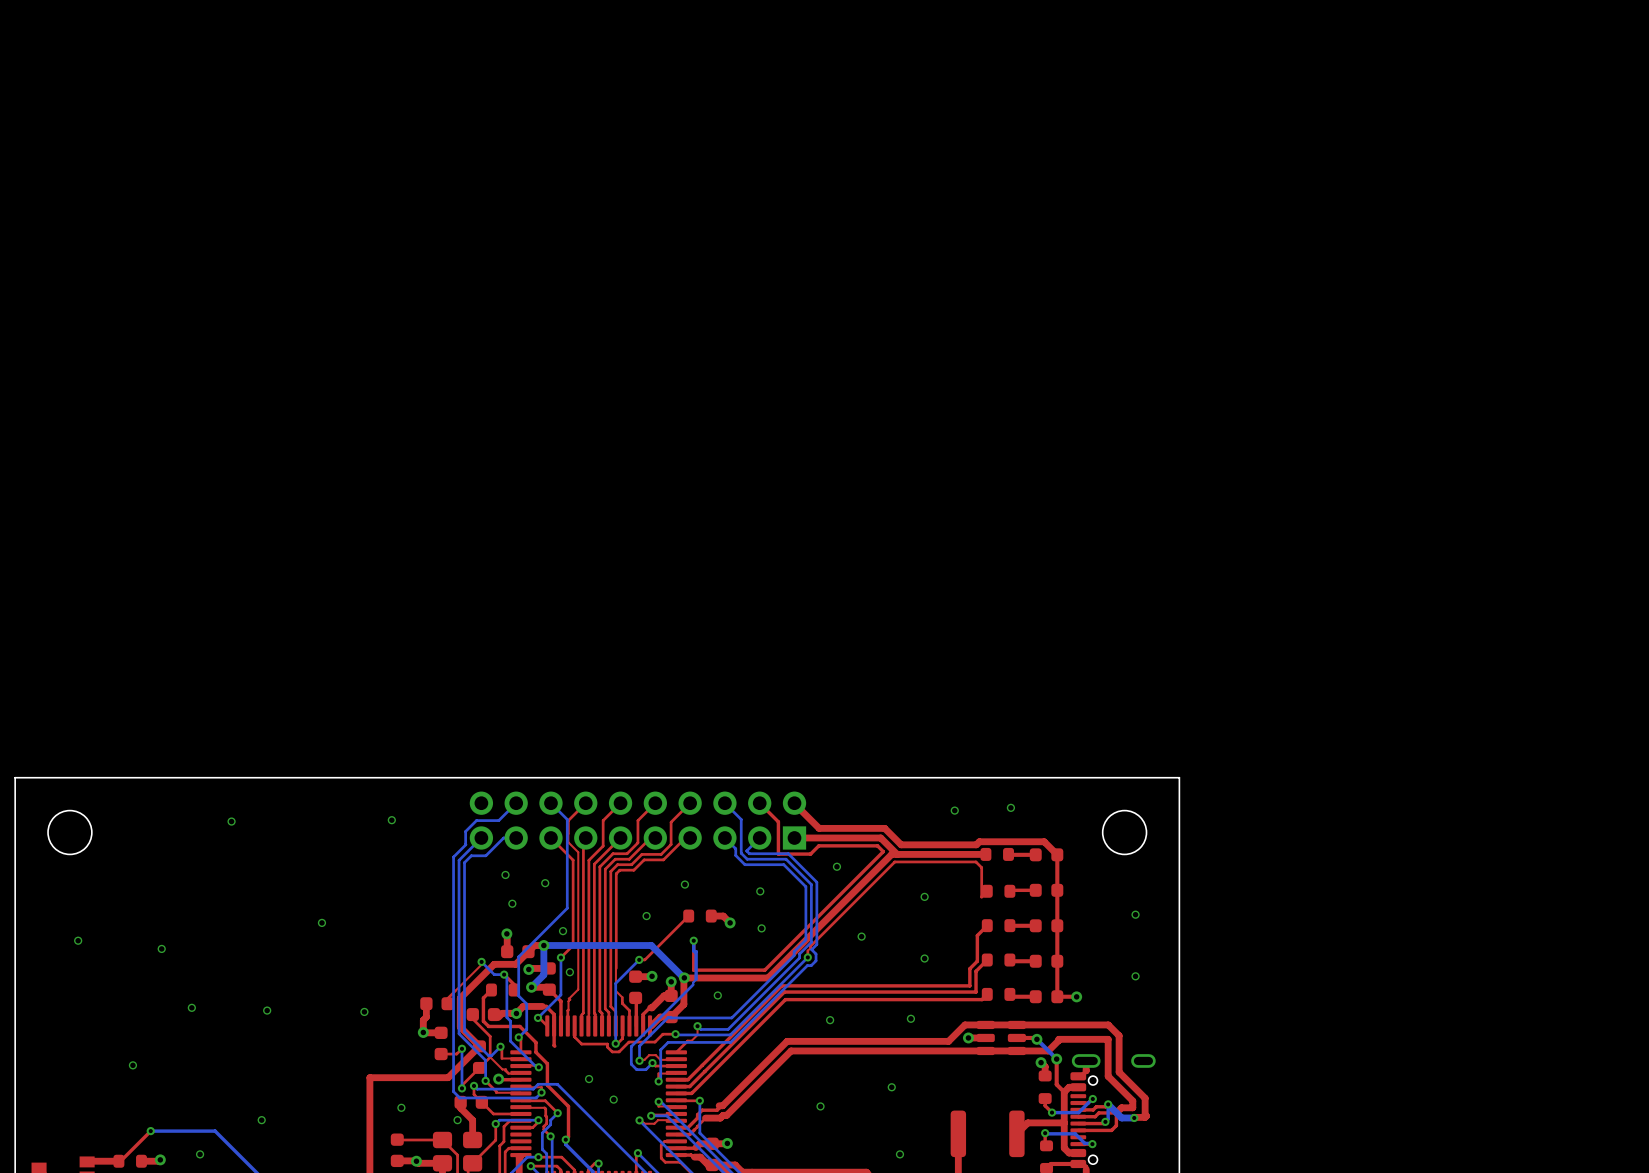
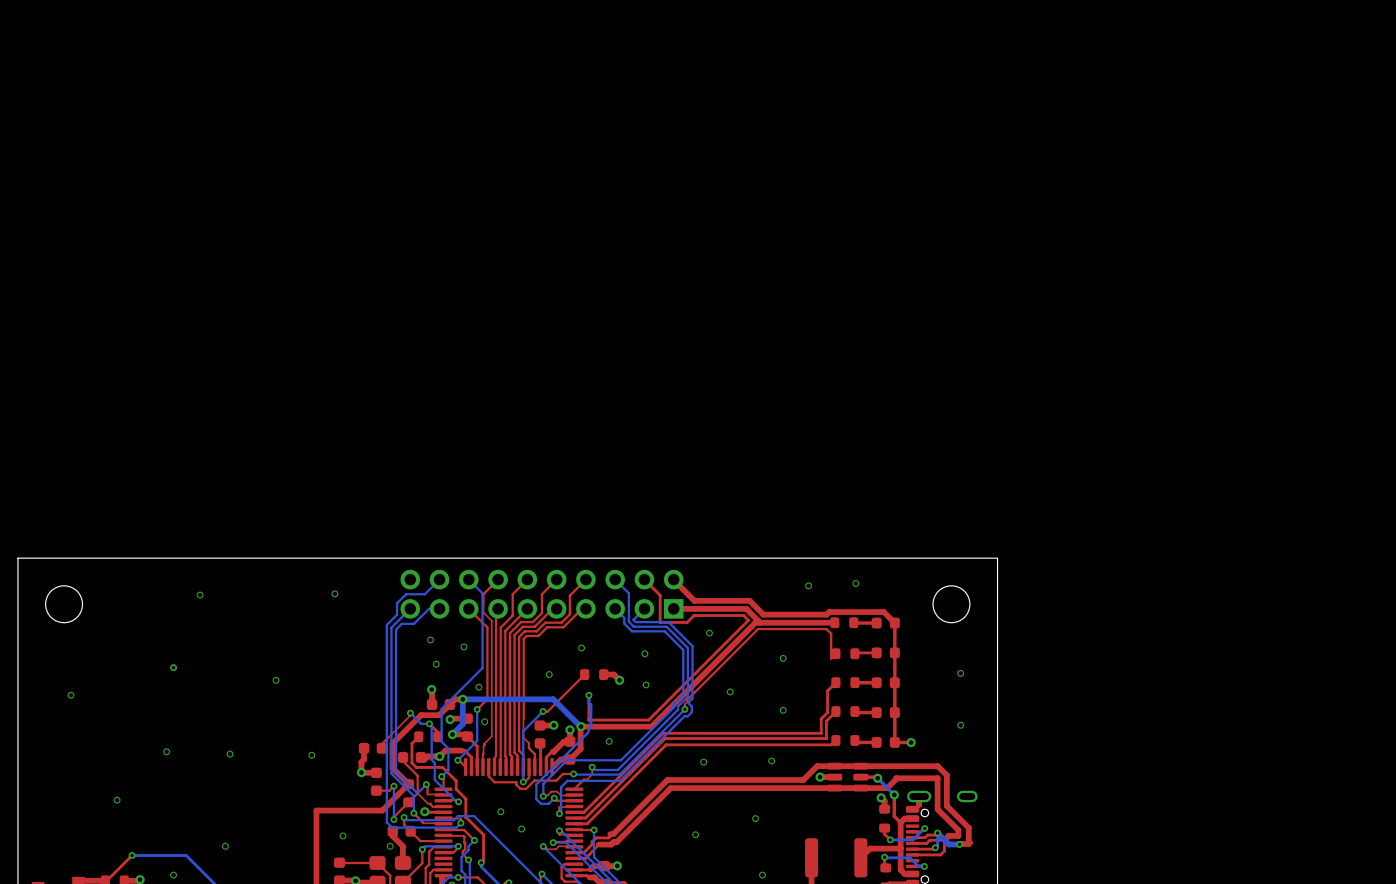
via: none -> (173, 667)
via: (161, 948) -> none
top track: (554, 1025) (554, 1046) -> none

